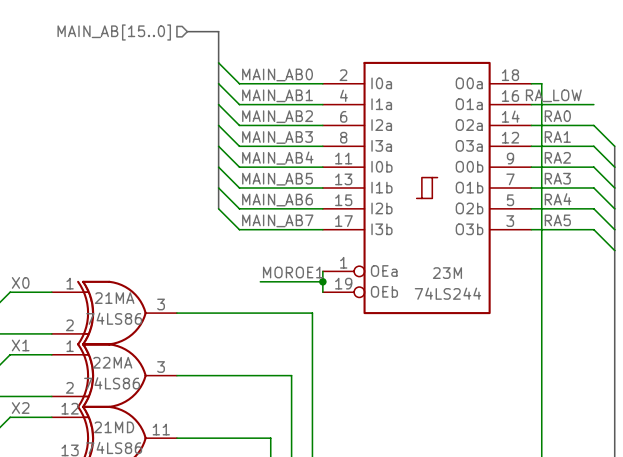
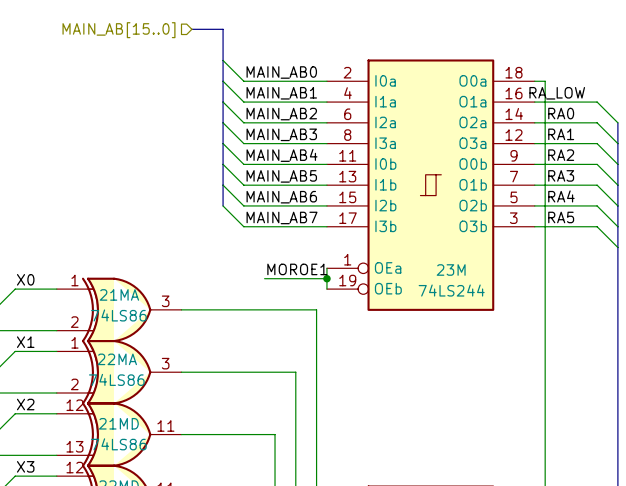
wire: none -> (597, 102) (617, 122)
bus: none -> (617, 122) (617, 143)

